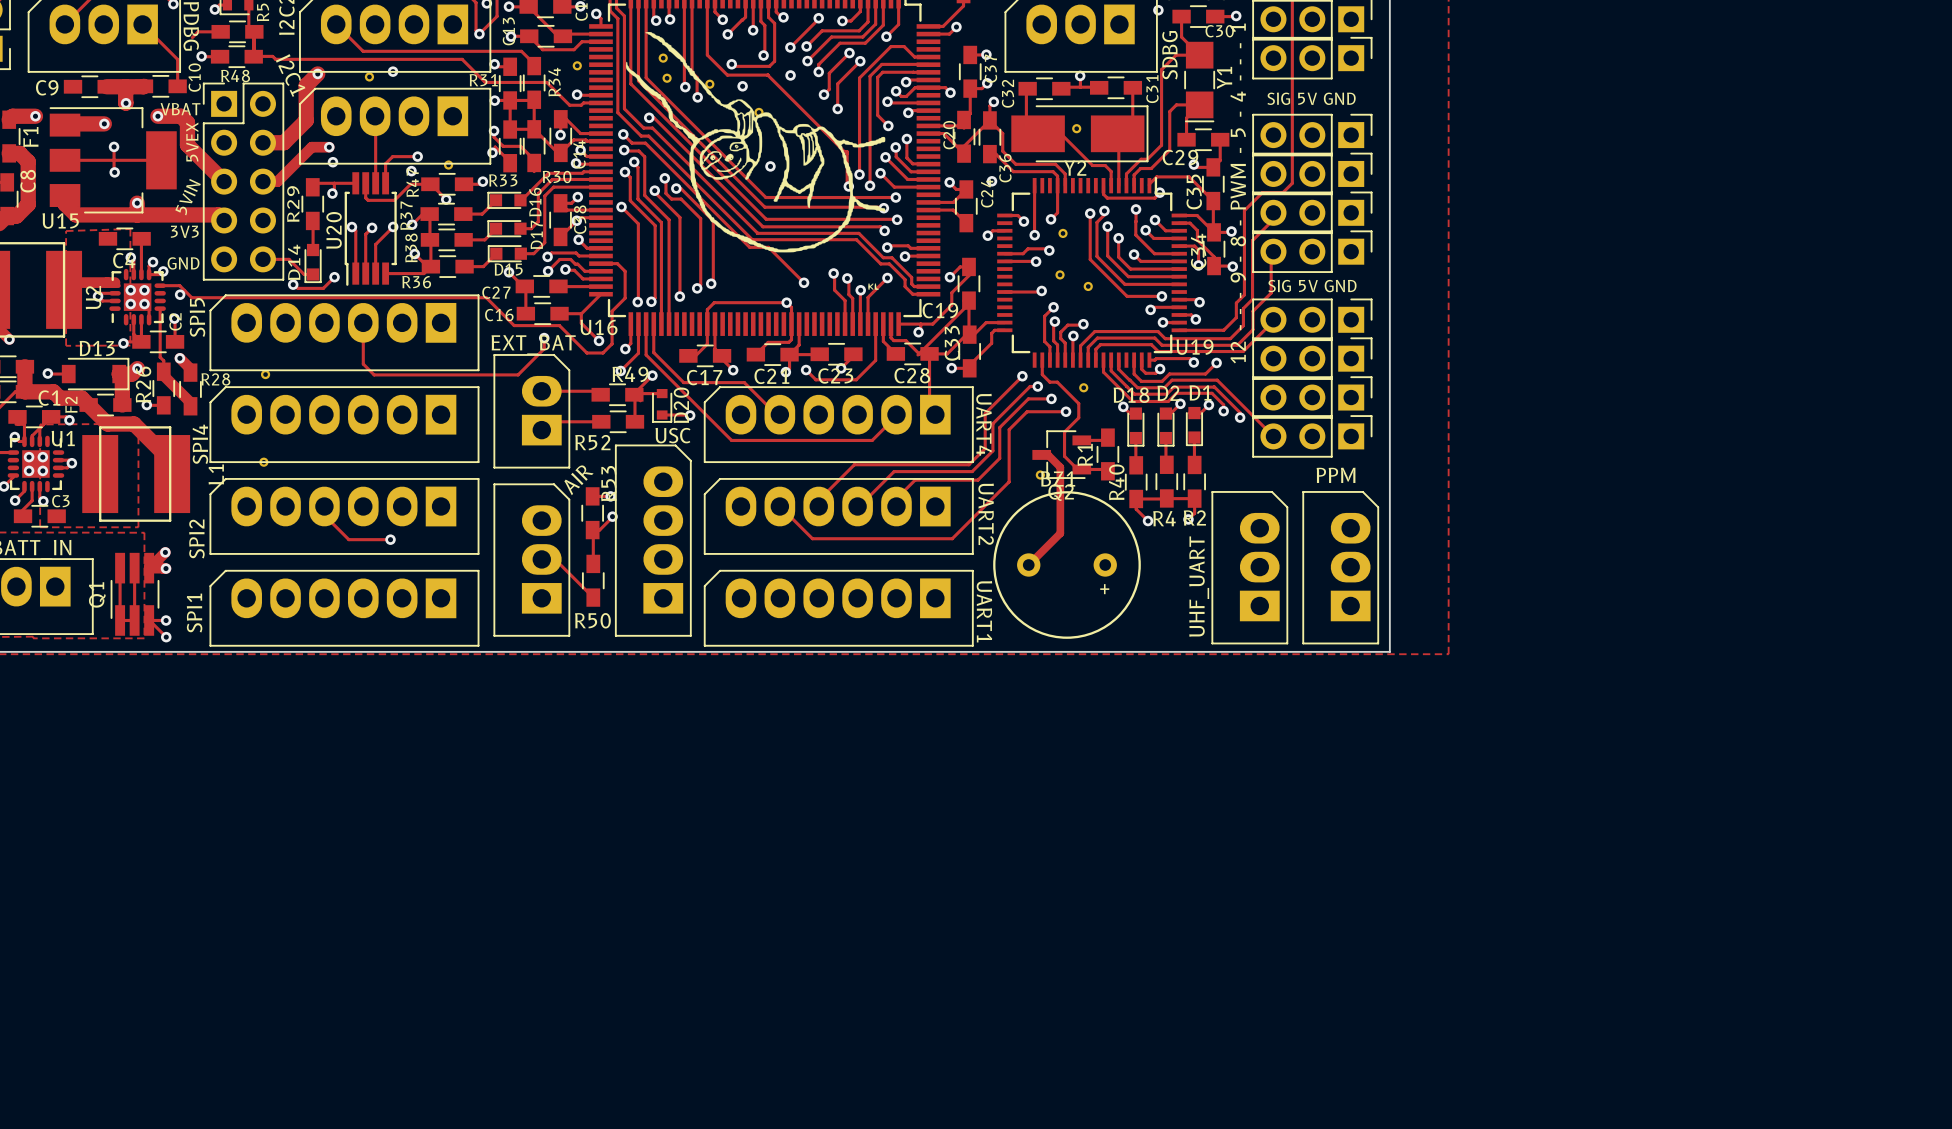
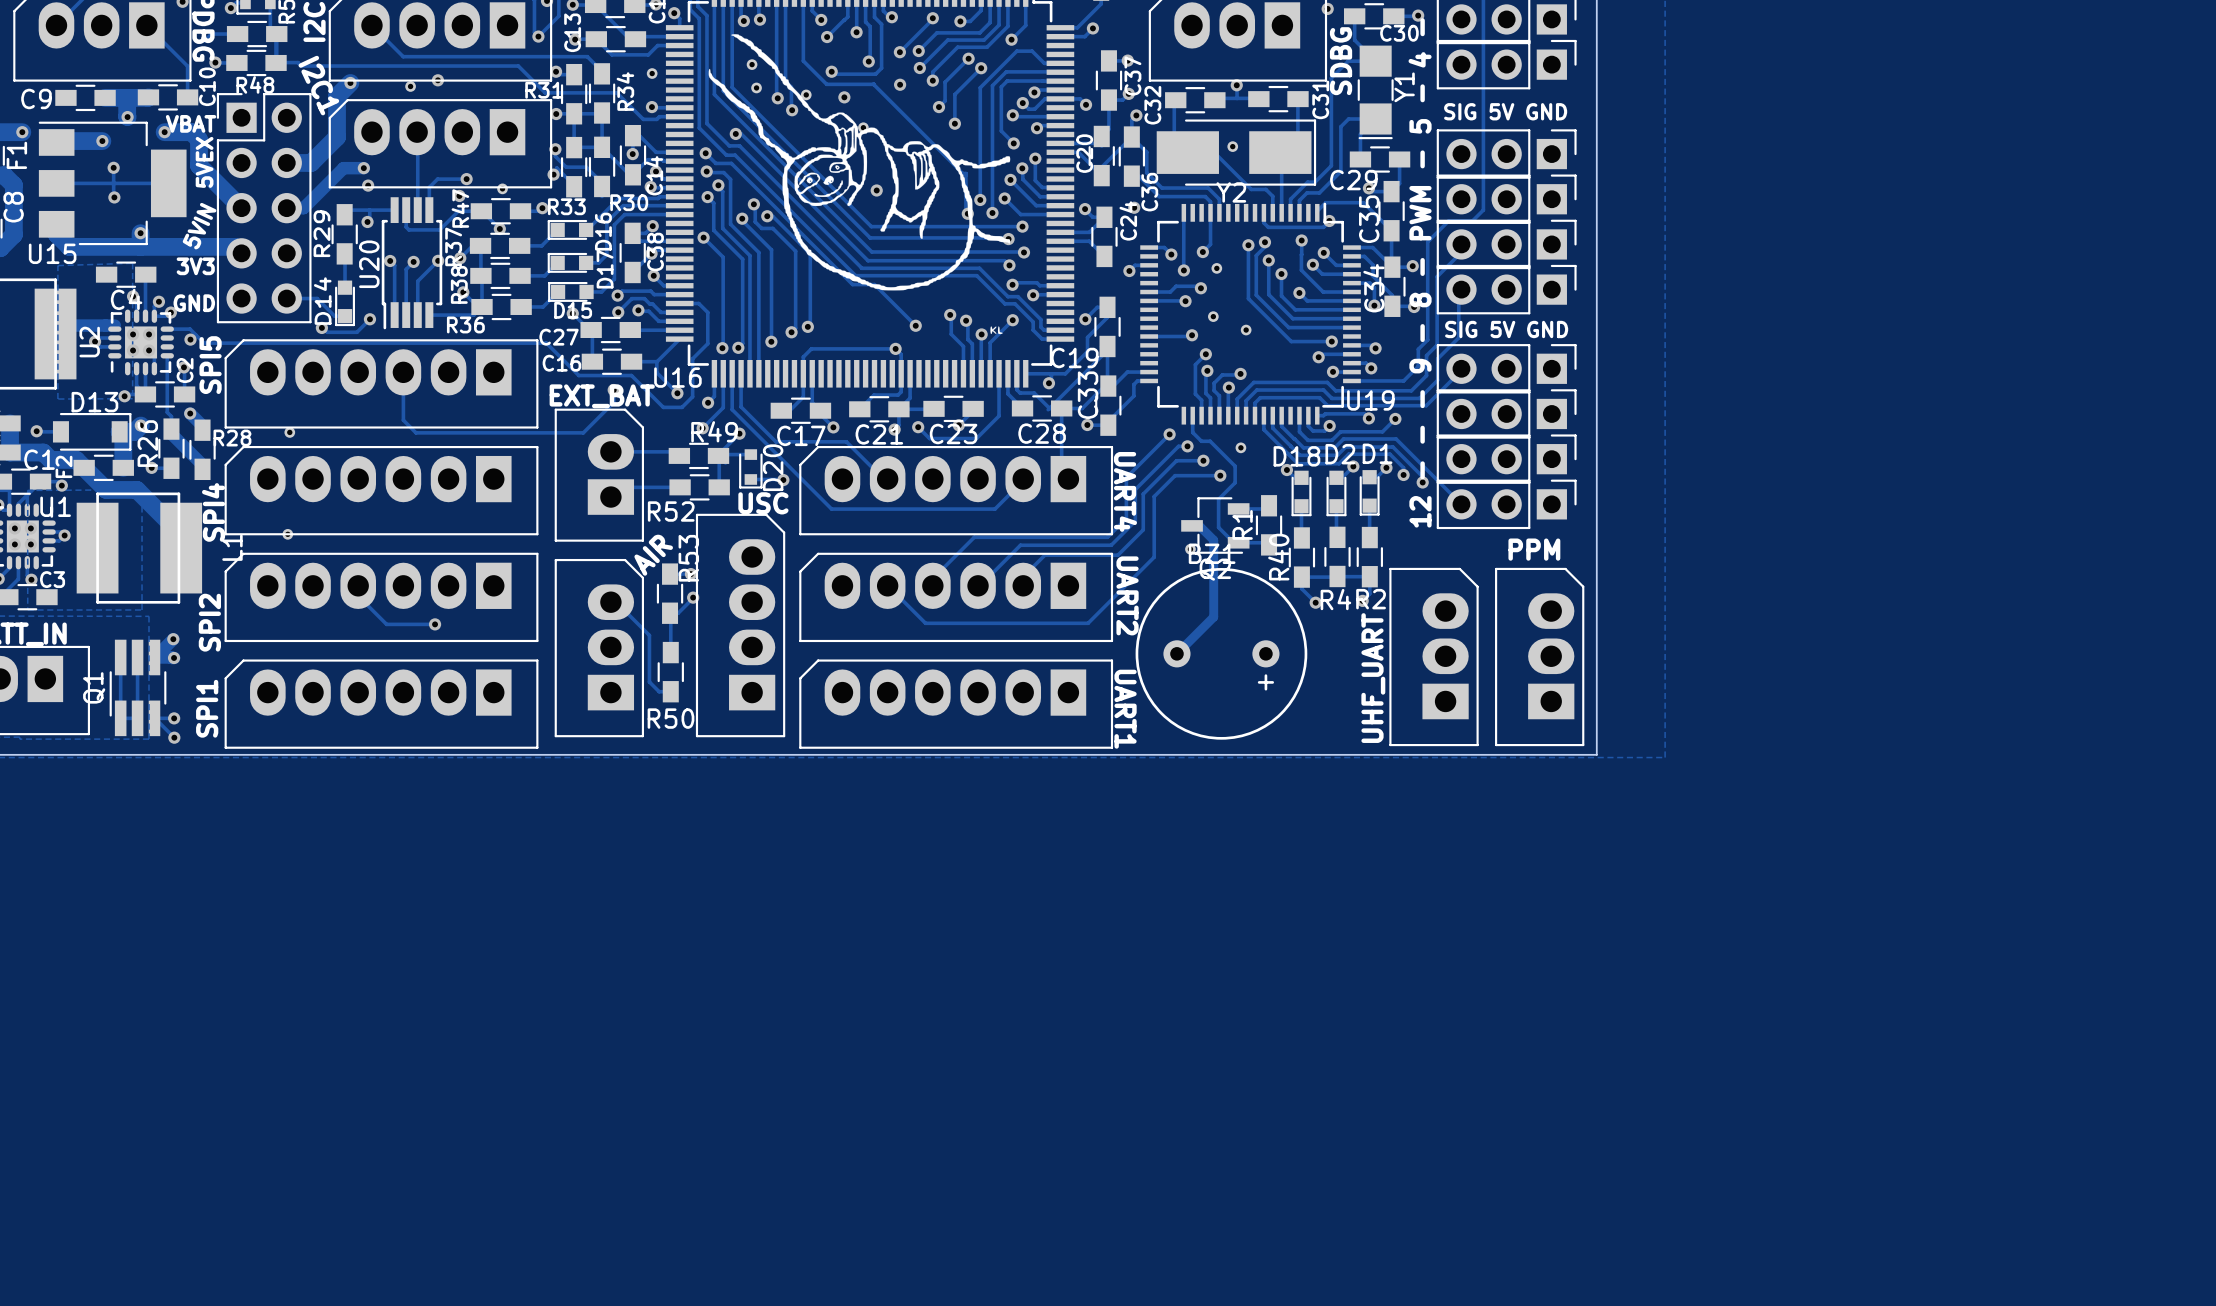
track: (541, 559) (555, 559) (593, 597) -> (610, 602) (616, 602) (649, 635) (649, 681) (659, 691) (670, 691)

